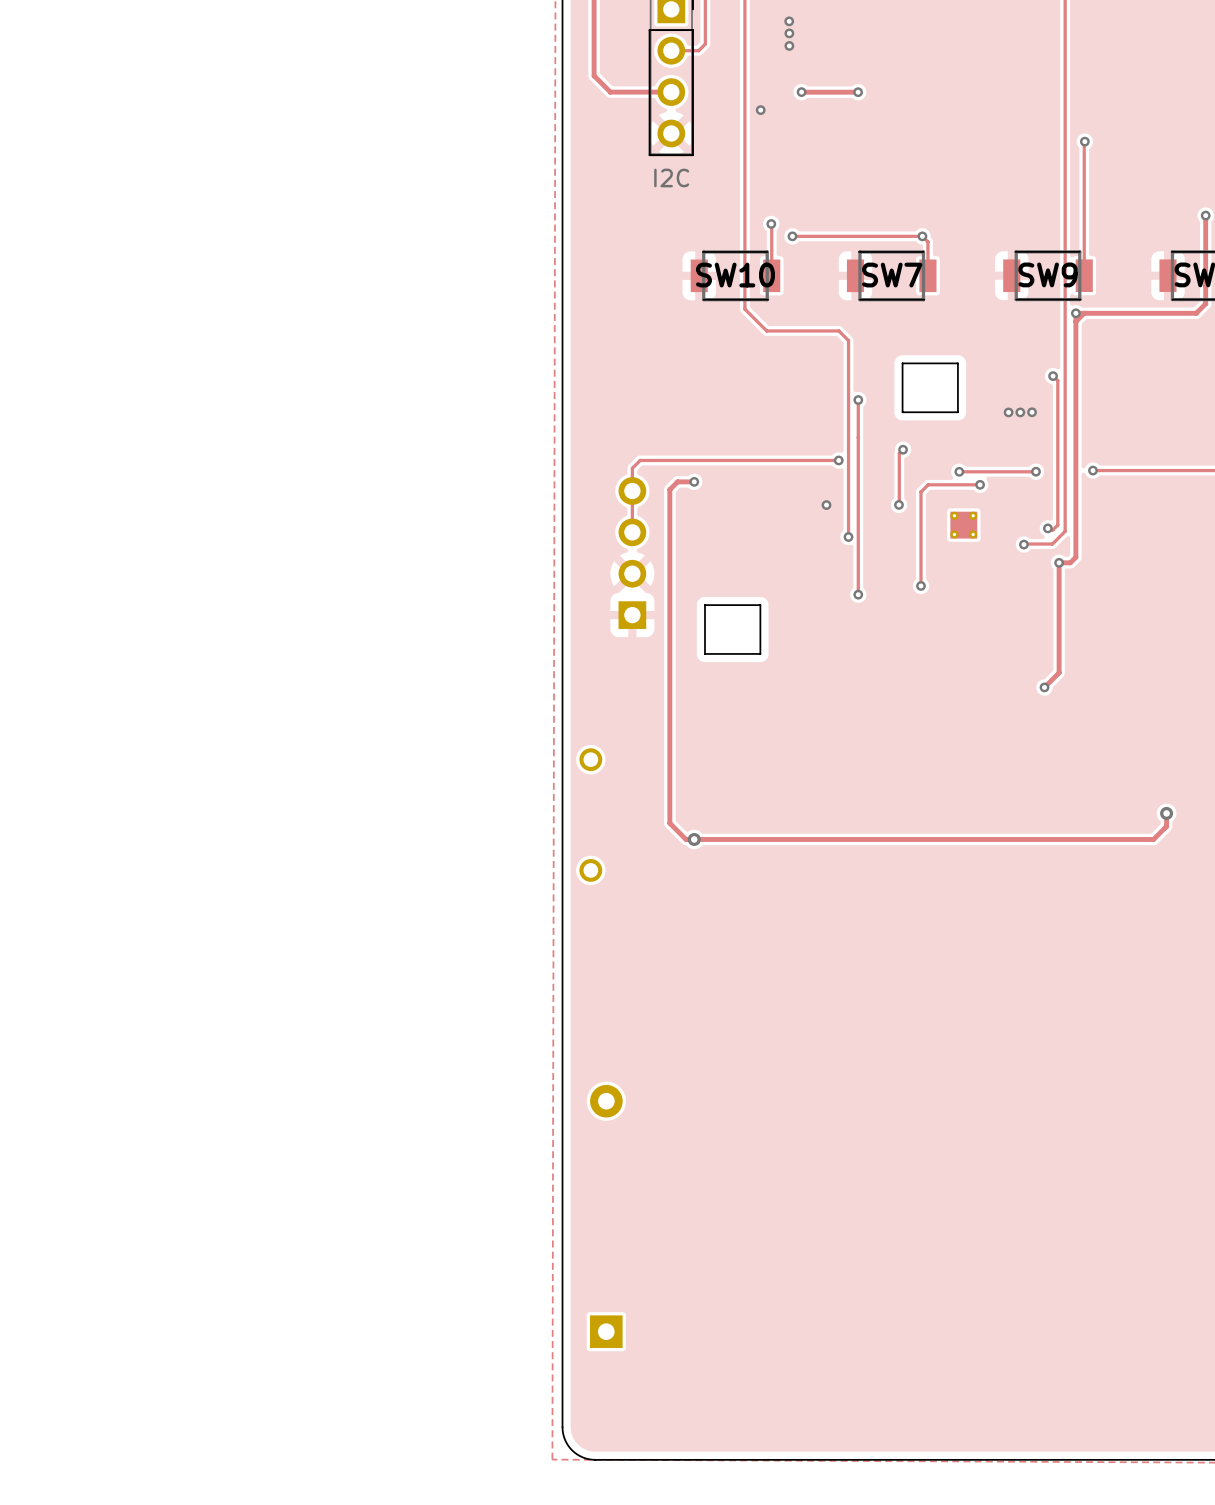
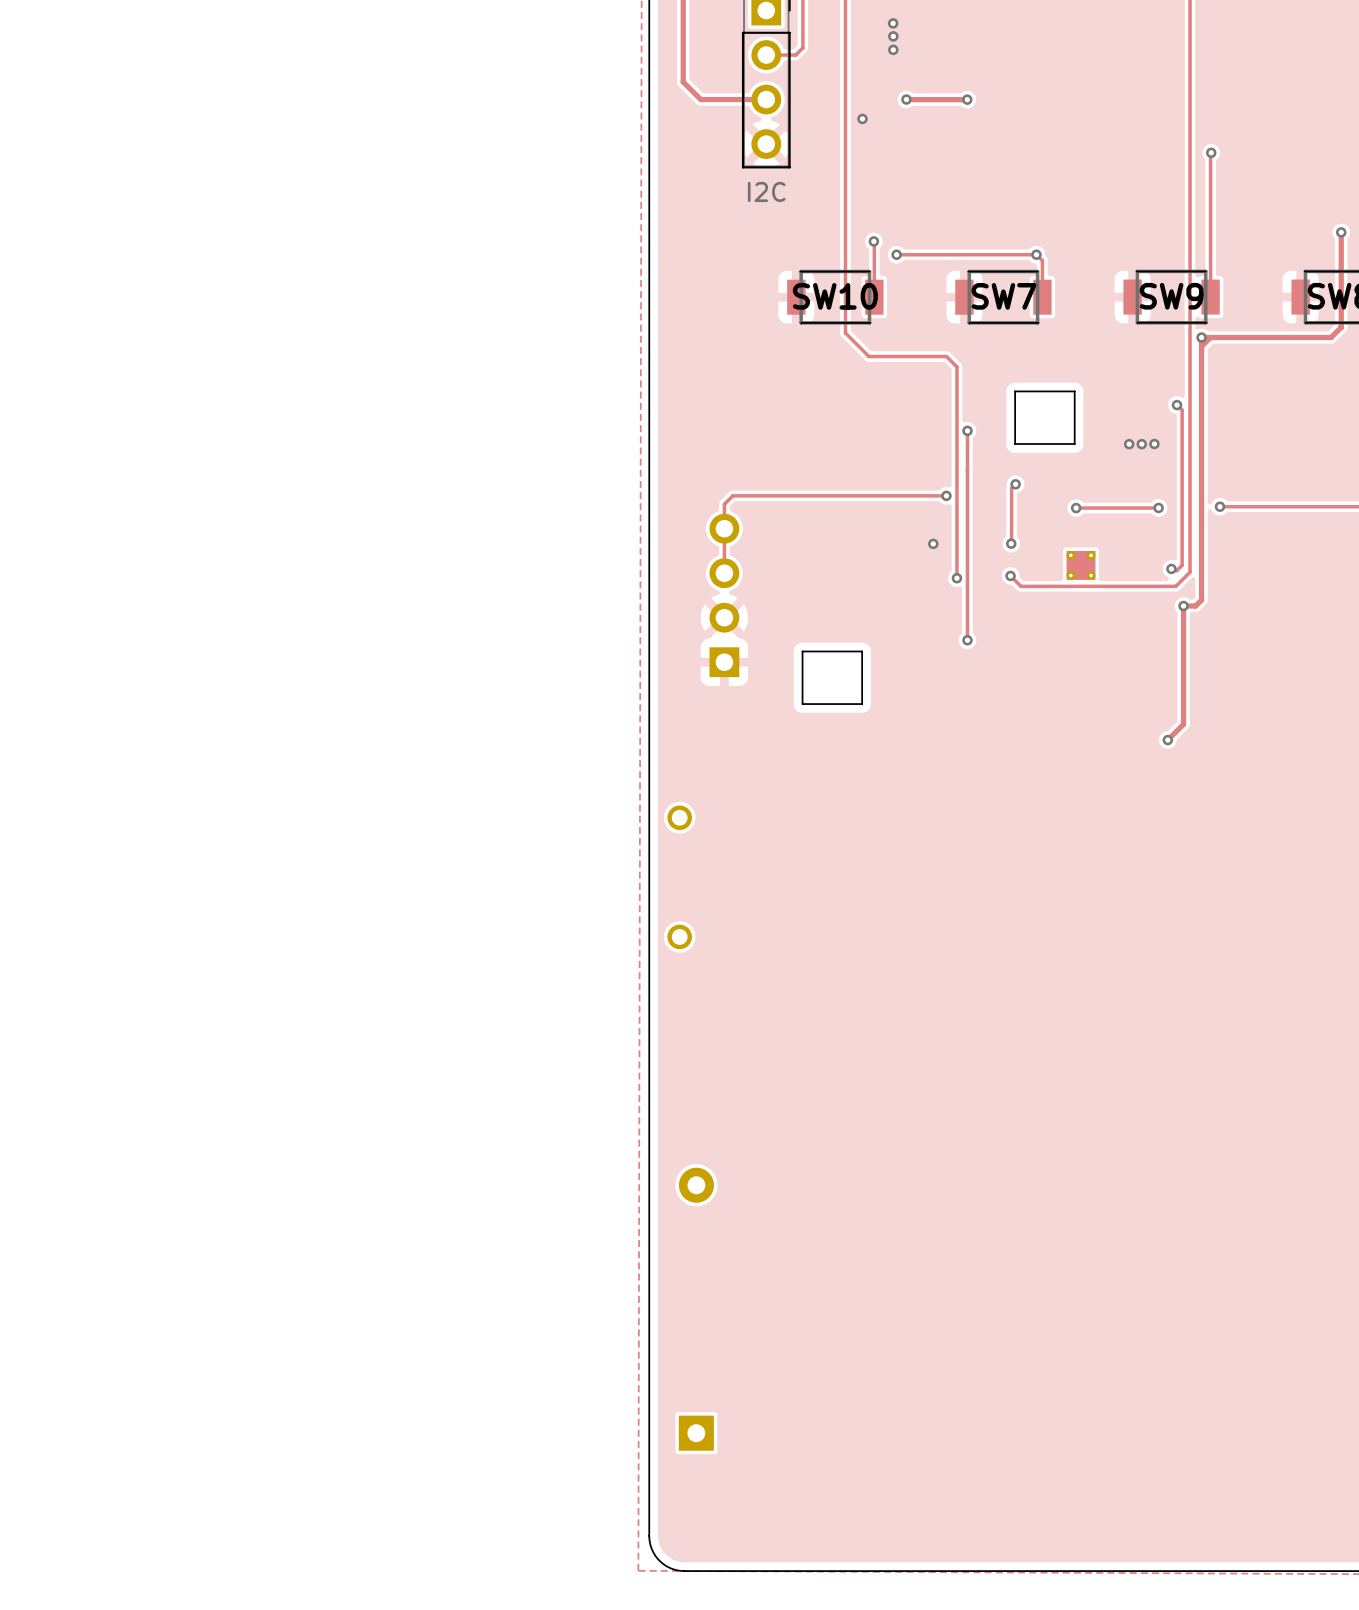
track: (694, 481) (677, 481) (669, 489) (669, 823) (686, 839) (1153, 839) (1166, 826) (1166, 810) -> none
via: (694, 481) -> none
track: (980, 484) (928, 484) (920, 491) (920, 585) -> none
via: (980, 484) -> none
via: none -> (1010, 575)
via: (1023, 544) -> none
track: (1052, 544) (1023, 544) -> (1176, 585) (1020, 586) (1010, 575)
via: (920, 585) -> none
via: (1166, 813) -> none
via: (694, 839) -> none

